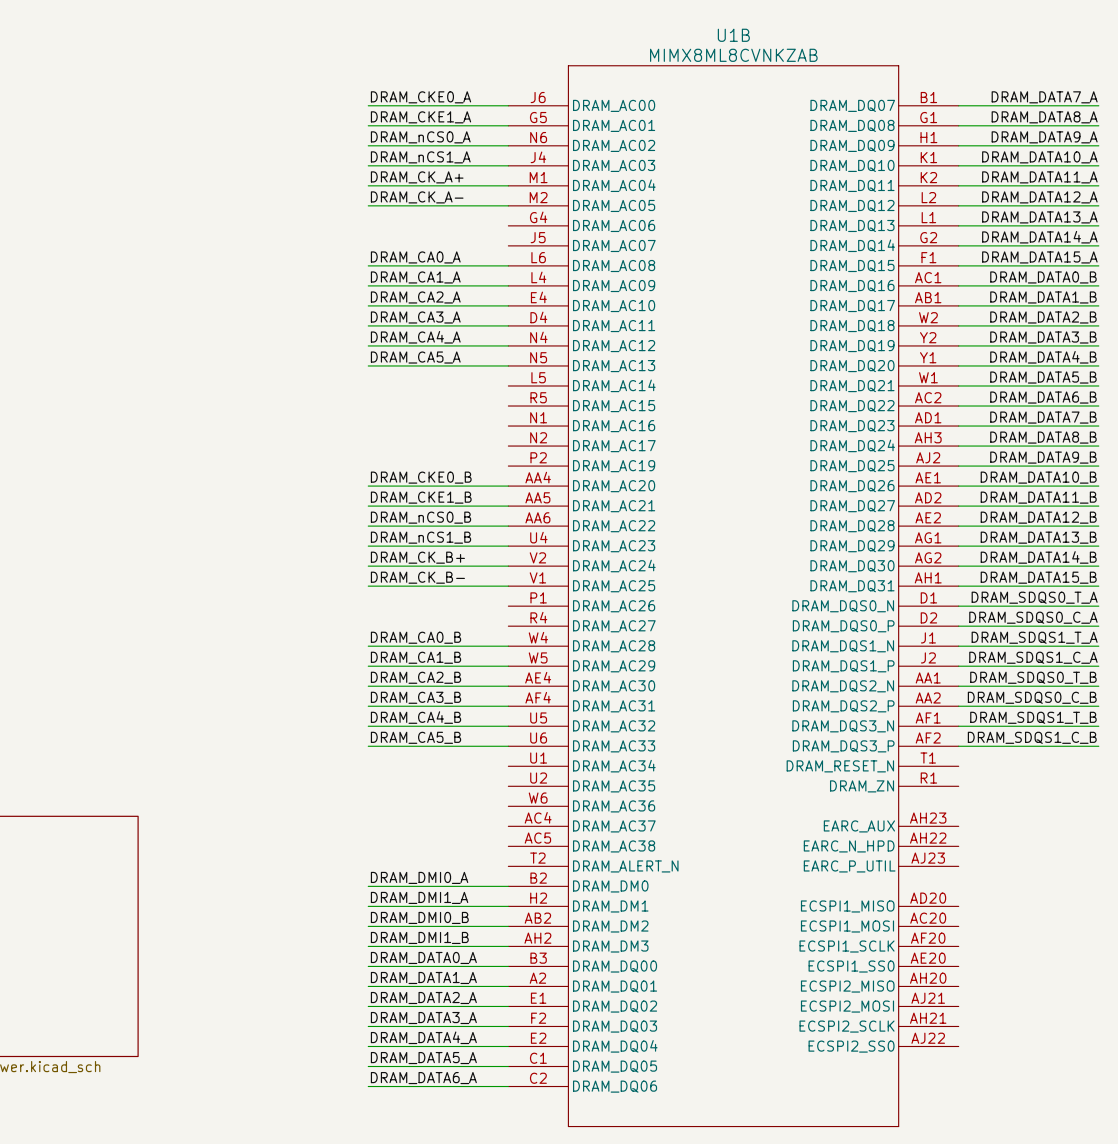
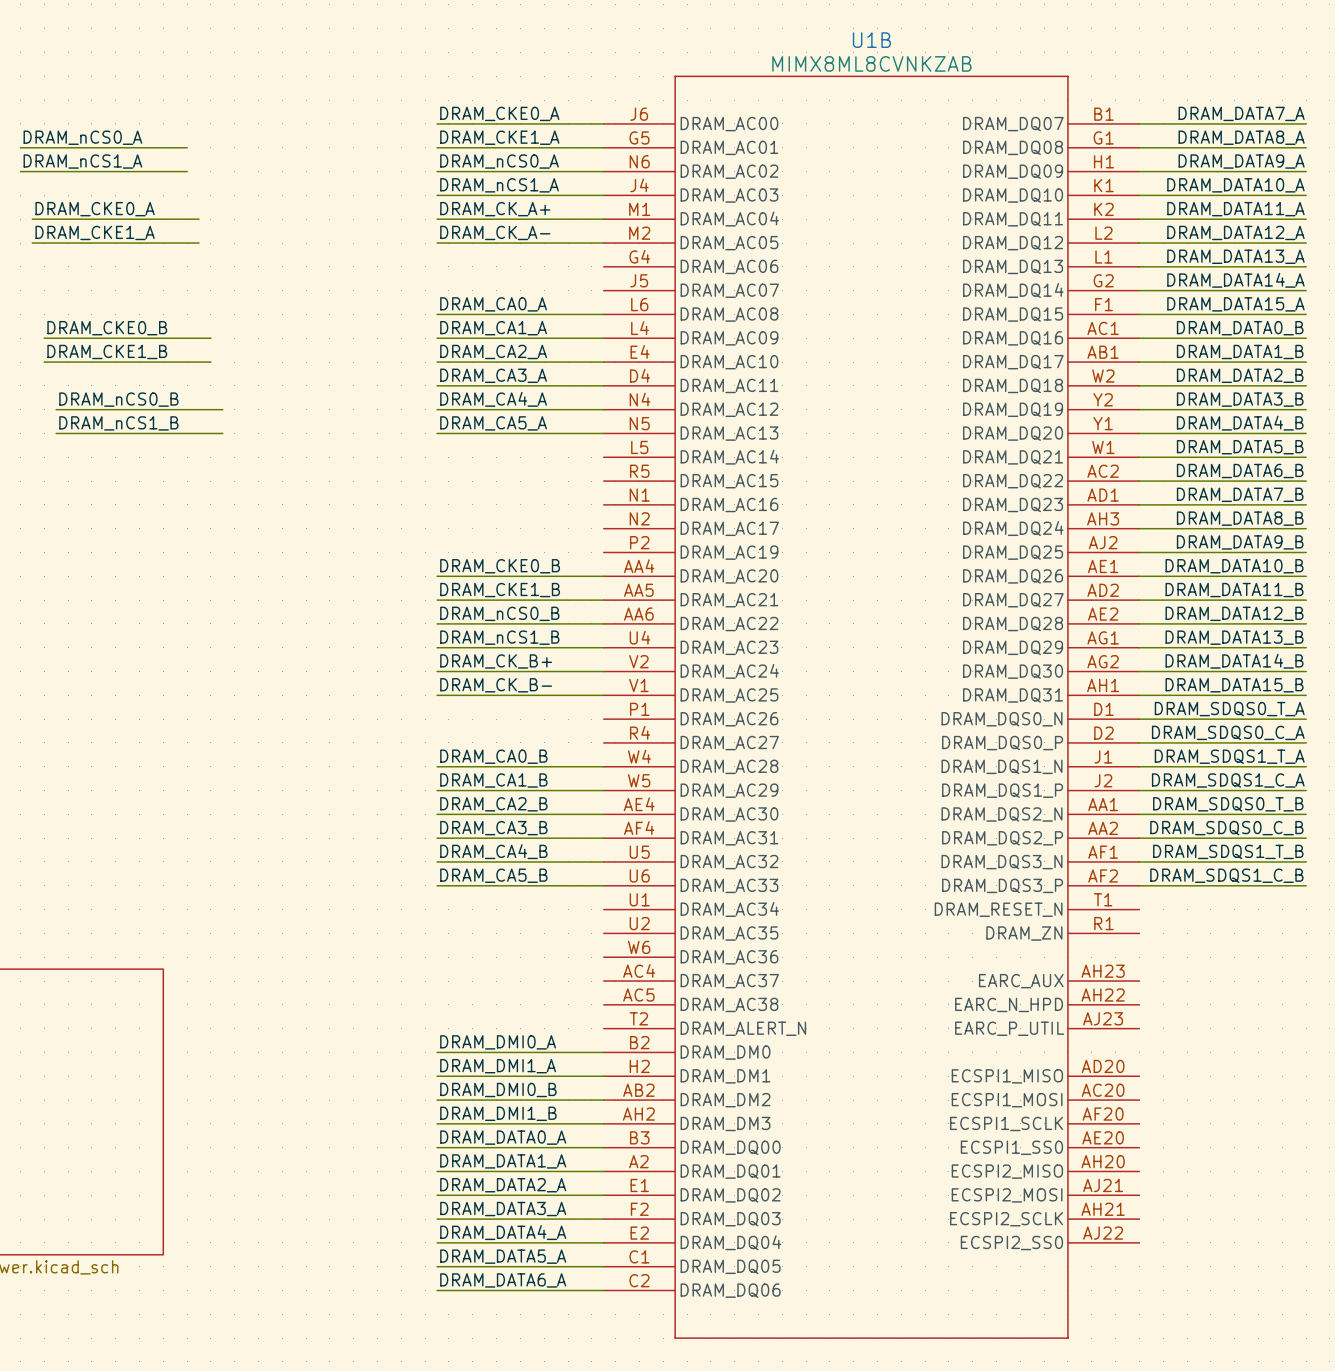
label: none -> DRAM_nCS0_A (82, 137)
wire: none -> (20, 147) (187, 147)
label: none -> DRAM_nCS1_A (82, 161)
wire: none -> (20, 171) (187, 171)
label: none -> DRAM_CKE0_A (95, 209)
wire: none -> (32, 219) (199, 219)
label: none -> DRAM_CKE1_A (95, 232)
wire: none -> (32, 243) (199, 243)
label: none -> DRAM_CKE0_B (107, 328)
wire: none -> (44, 338) (210, 338)
label: none -> DRAM_CKE1_B (107, 351)
wire: none -> (44, 362) (210, 362)
label: none -> DRAM_nCS0_B (118, 399)
wire: none -> (56, 409) (222, 409)
label: none -> DRAM_nCS1_B (118, 423)
wire: none -> (56, 433) (222, 433)

